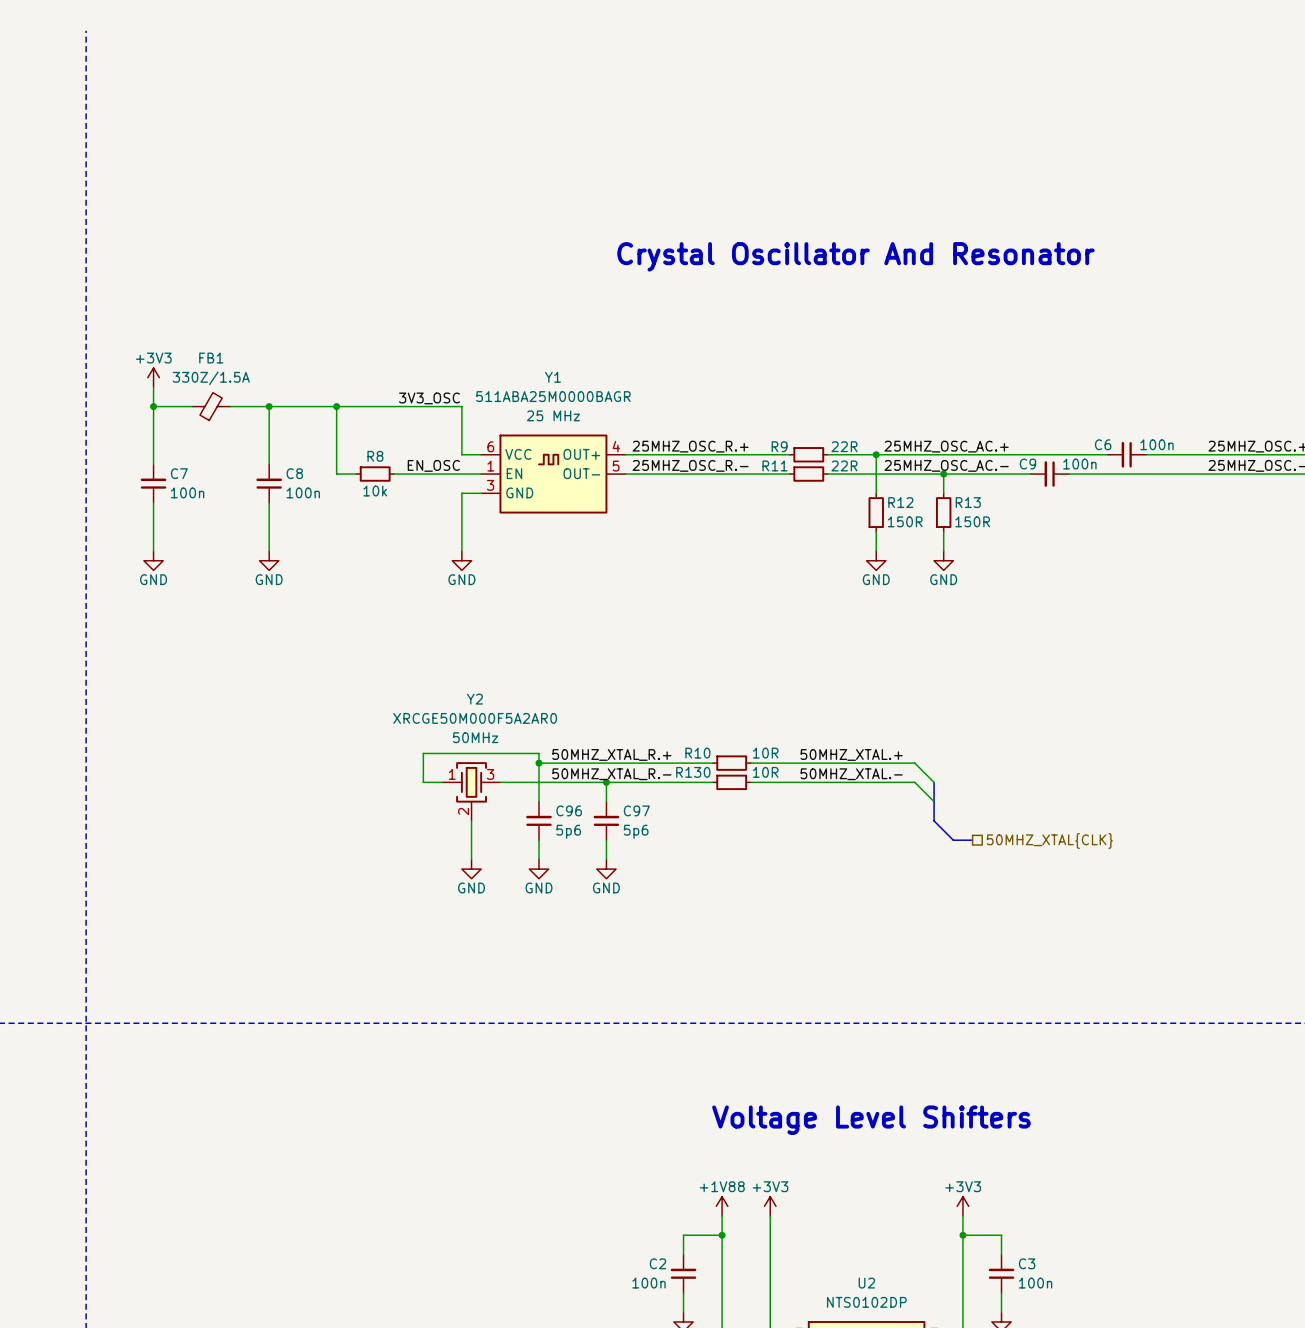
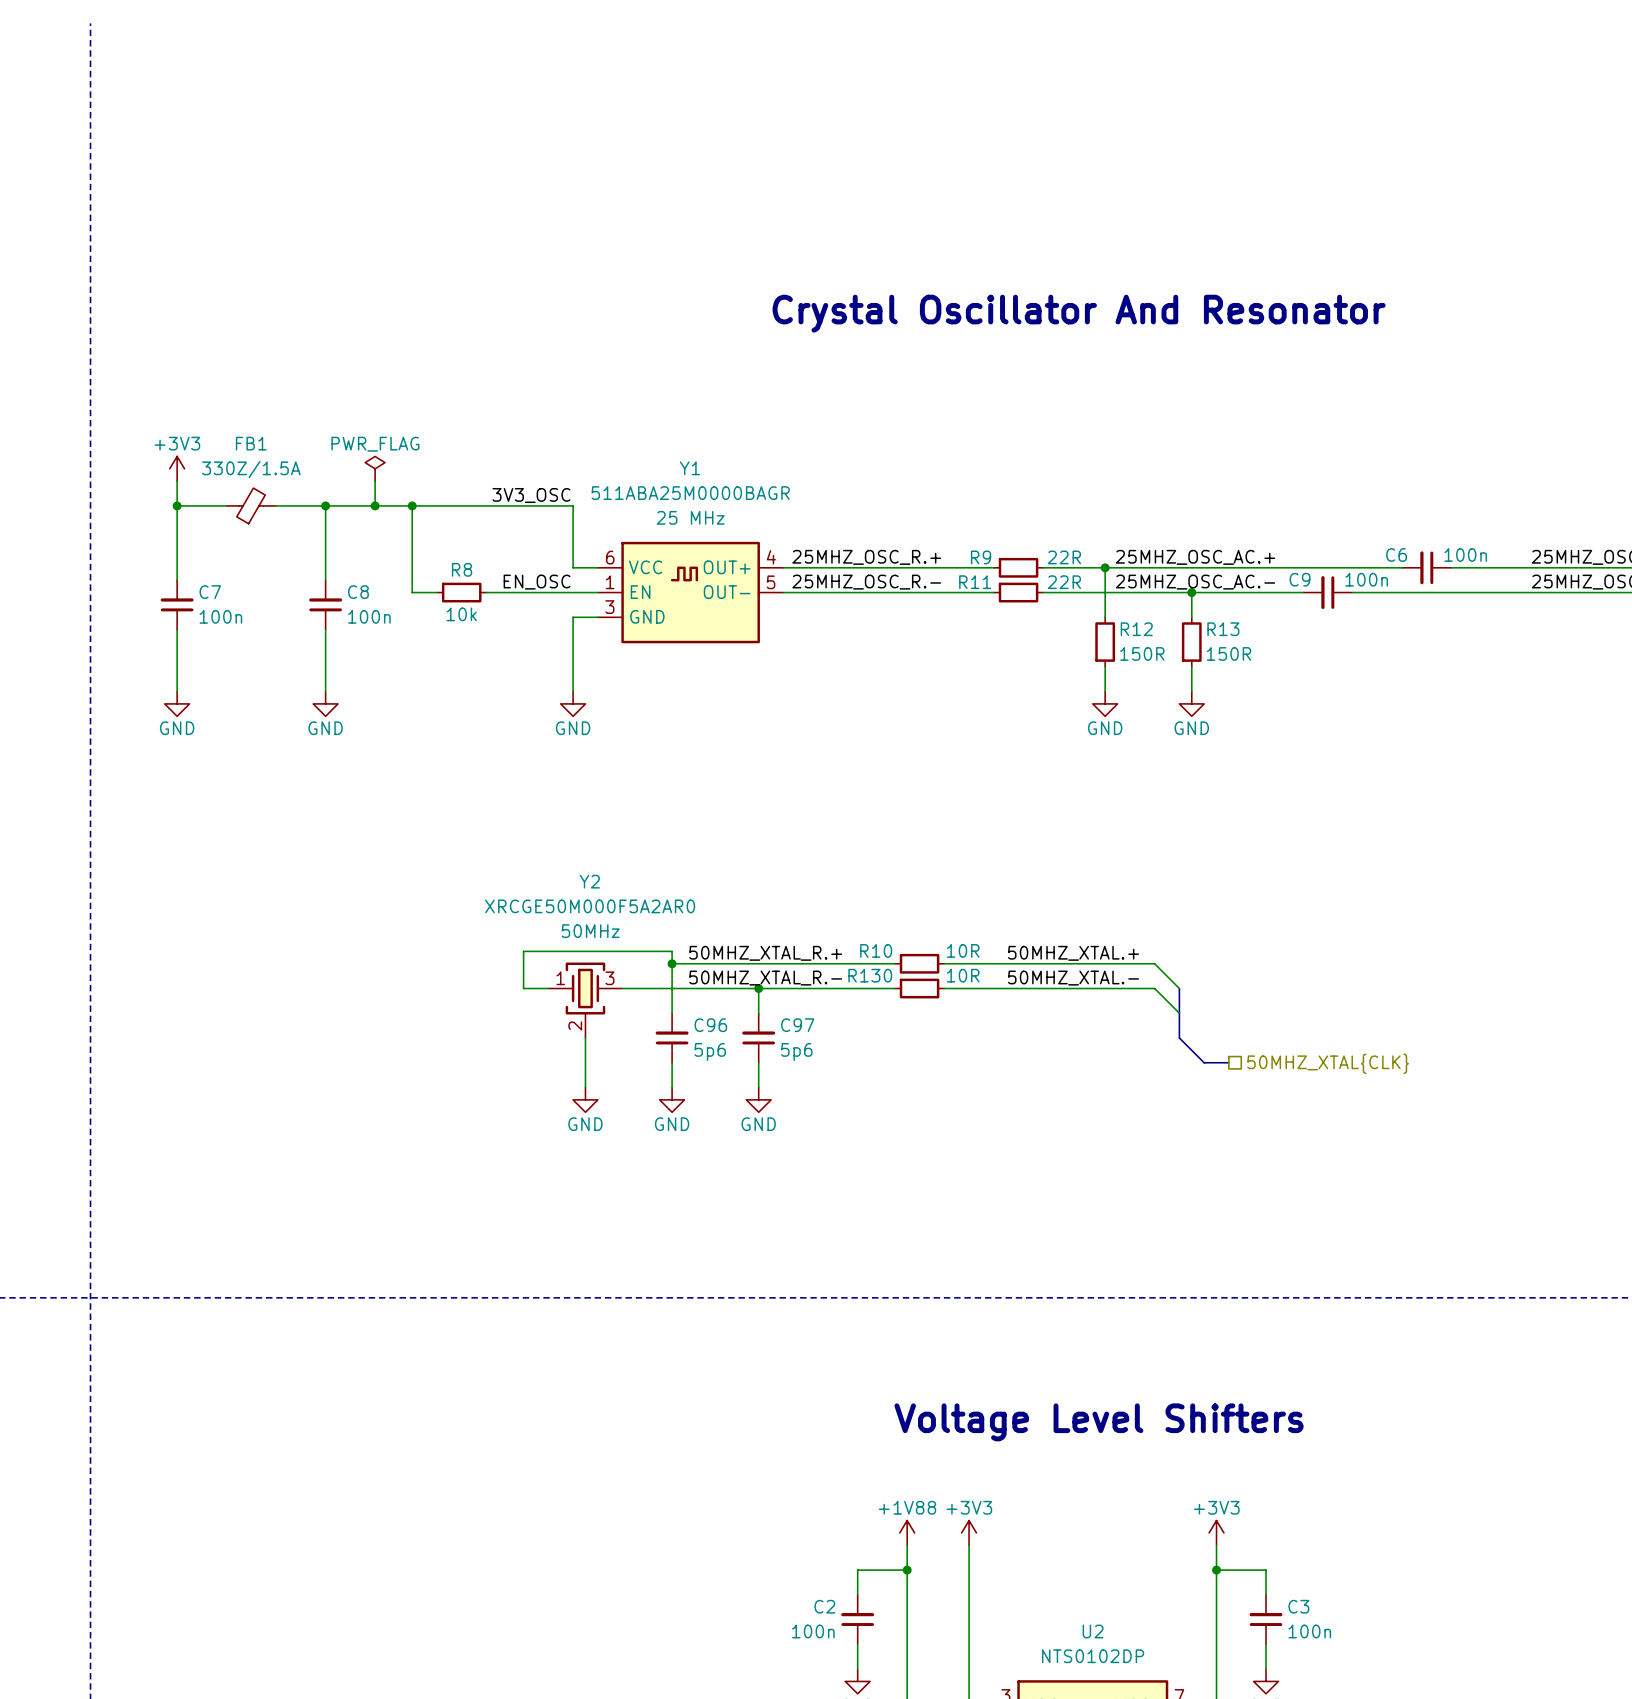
power symbol: none -> PWR_FLAG (375, 468)
wire: none -> (375, 481) (375, 505)
junction: none -> (375, 505)

